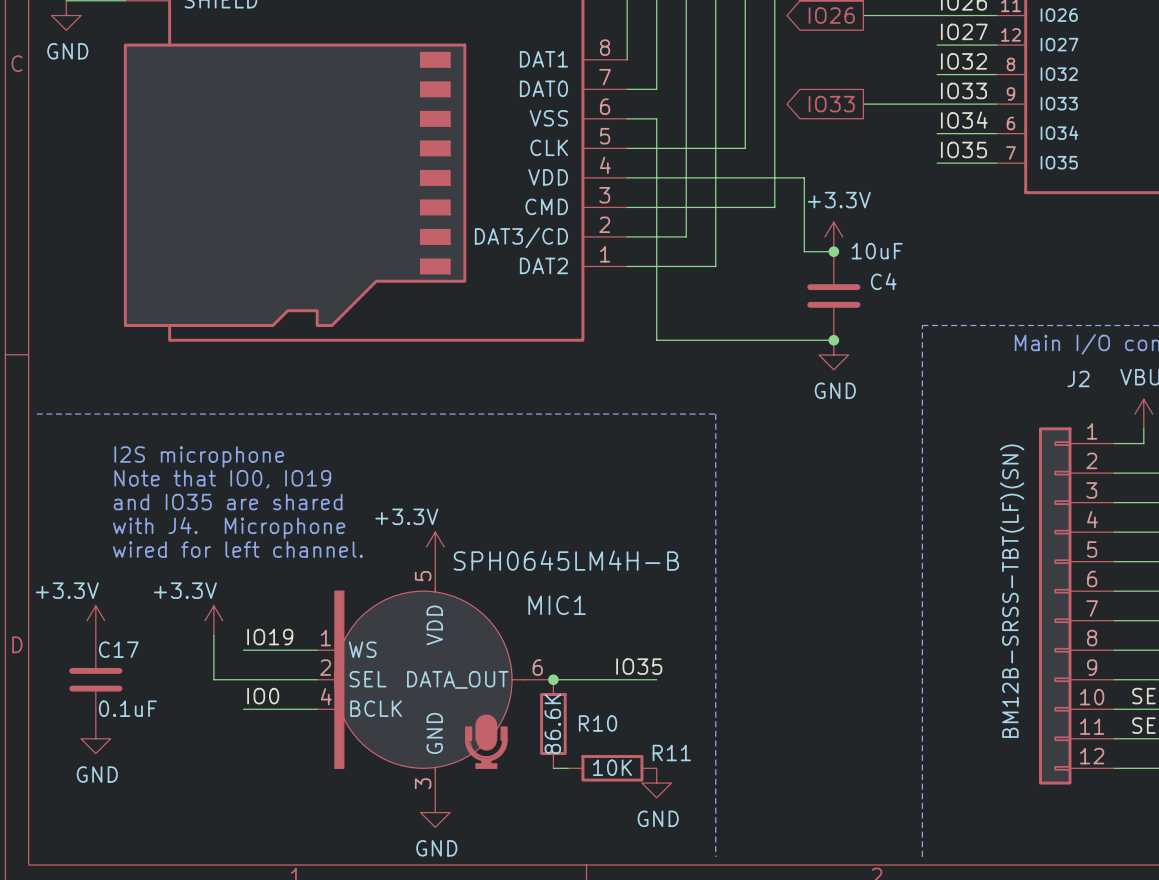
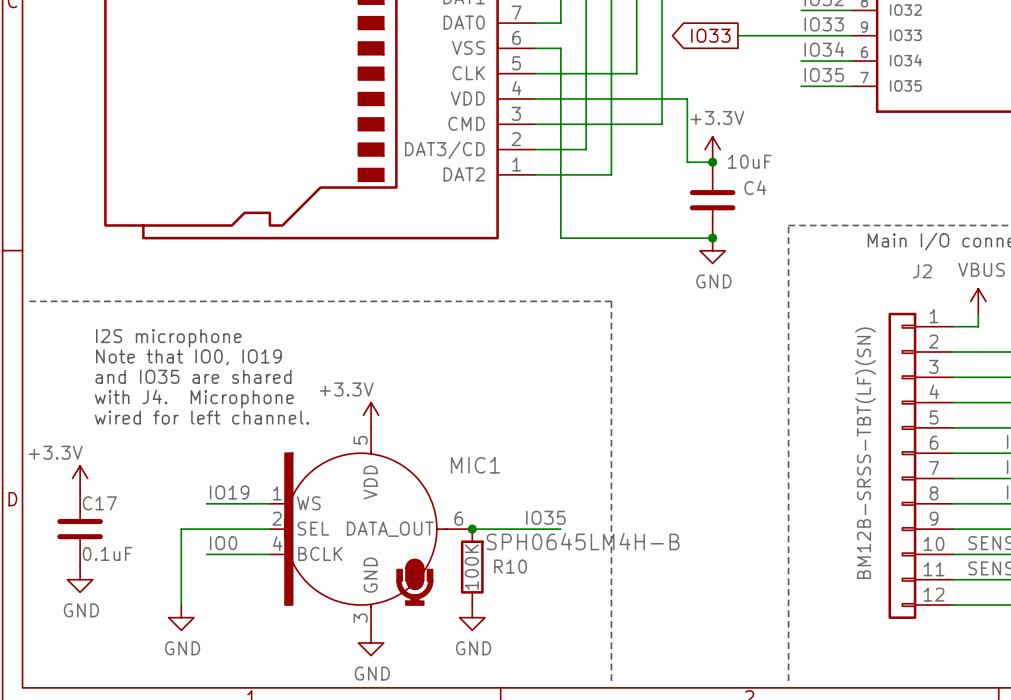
MIC1 value position: SPH0645LM4H-B (566, 560) -> SPH0645LM4H-B (583, 541)
power symbol: +3.3V (213, 620) -> none
wire: (213, 635) (213, 679) -> (181, 605) (181, 529)
R10 value: 86.6K (552, 724) -> 100K (471, 567)
wire: (553, 768) (568, 768) -> none
R11: 10K (612, 768) -> none
power symbol: none -> GND (181, 617)
power symbol position: GND (656, 783) -> GND (472, 617)

